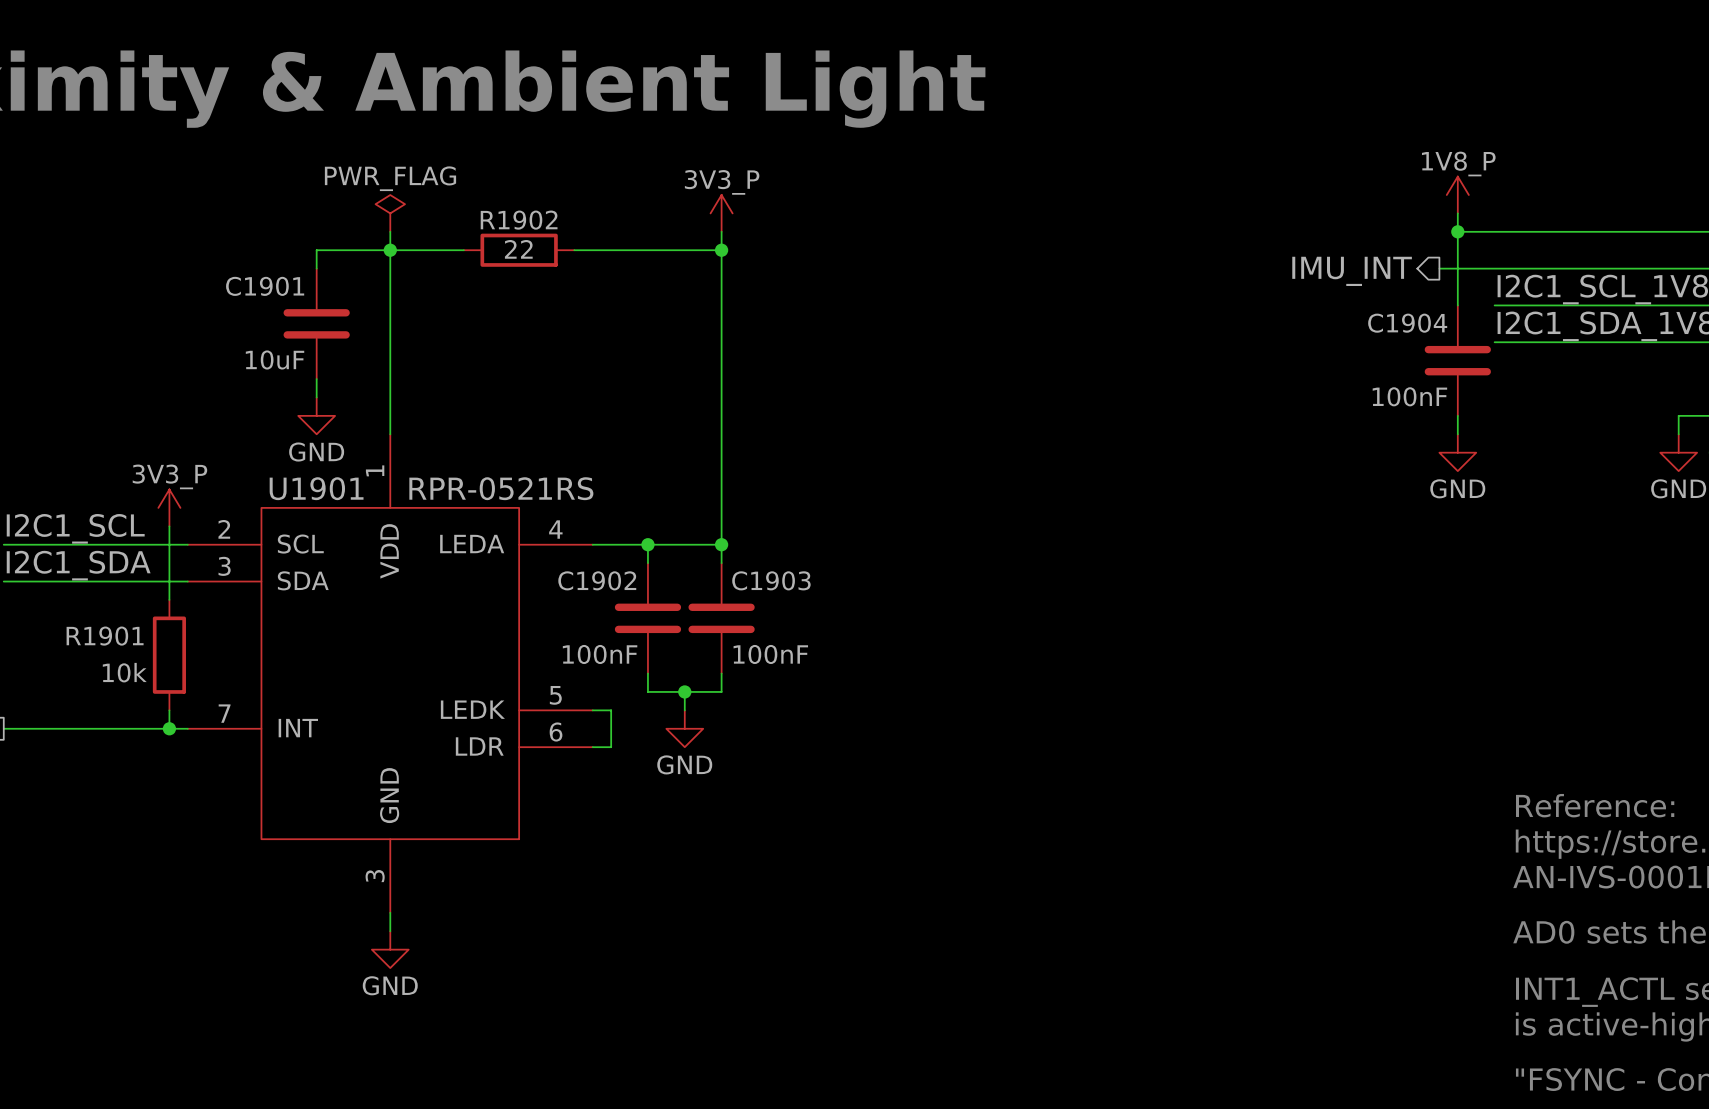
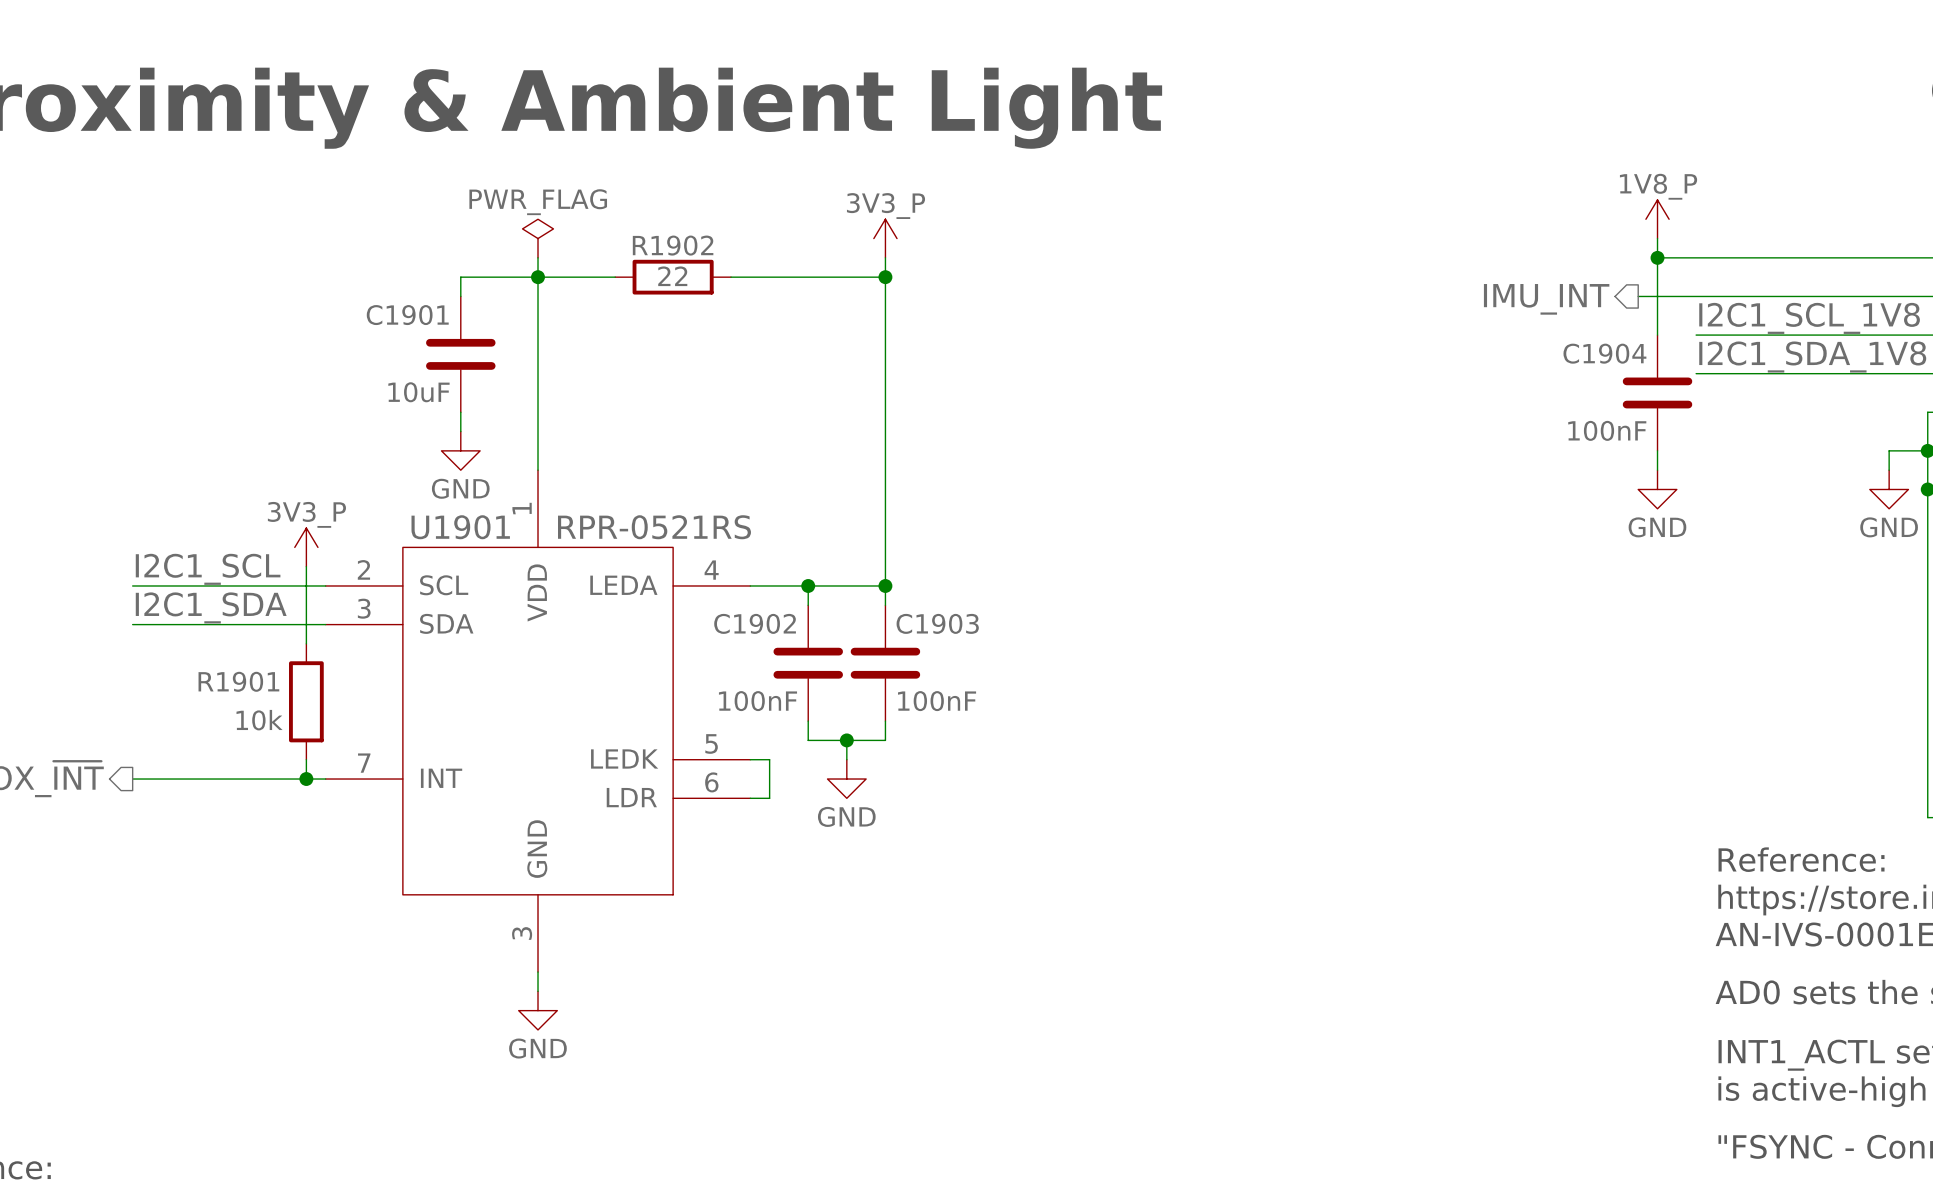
C1901 name position: C1901 (265, 286) -> C1901 (407, 315)
C1901 value position: 10uF (275, 359) -> 10uF (418, 392)

